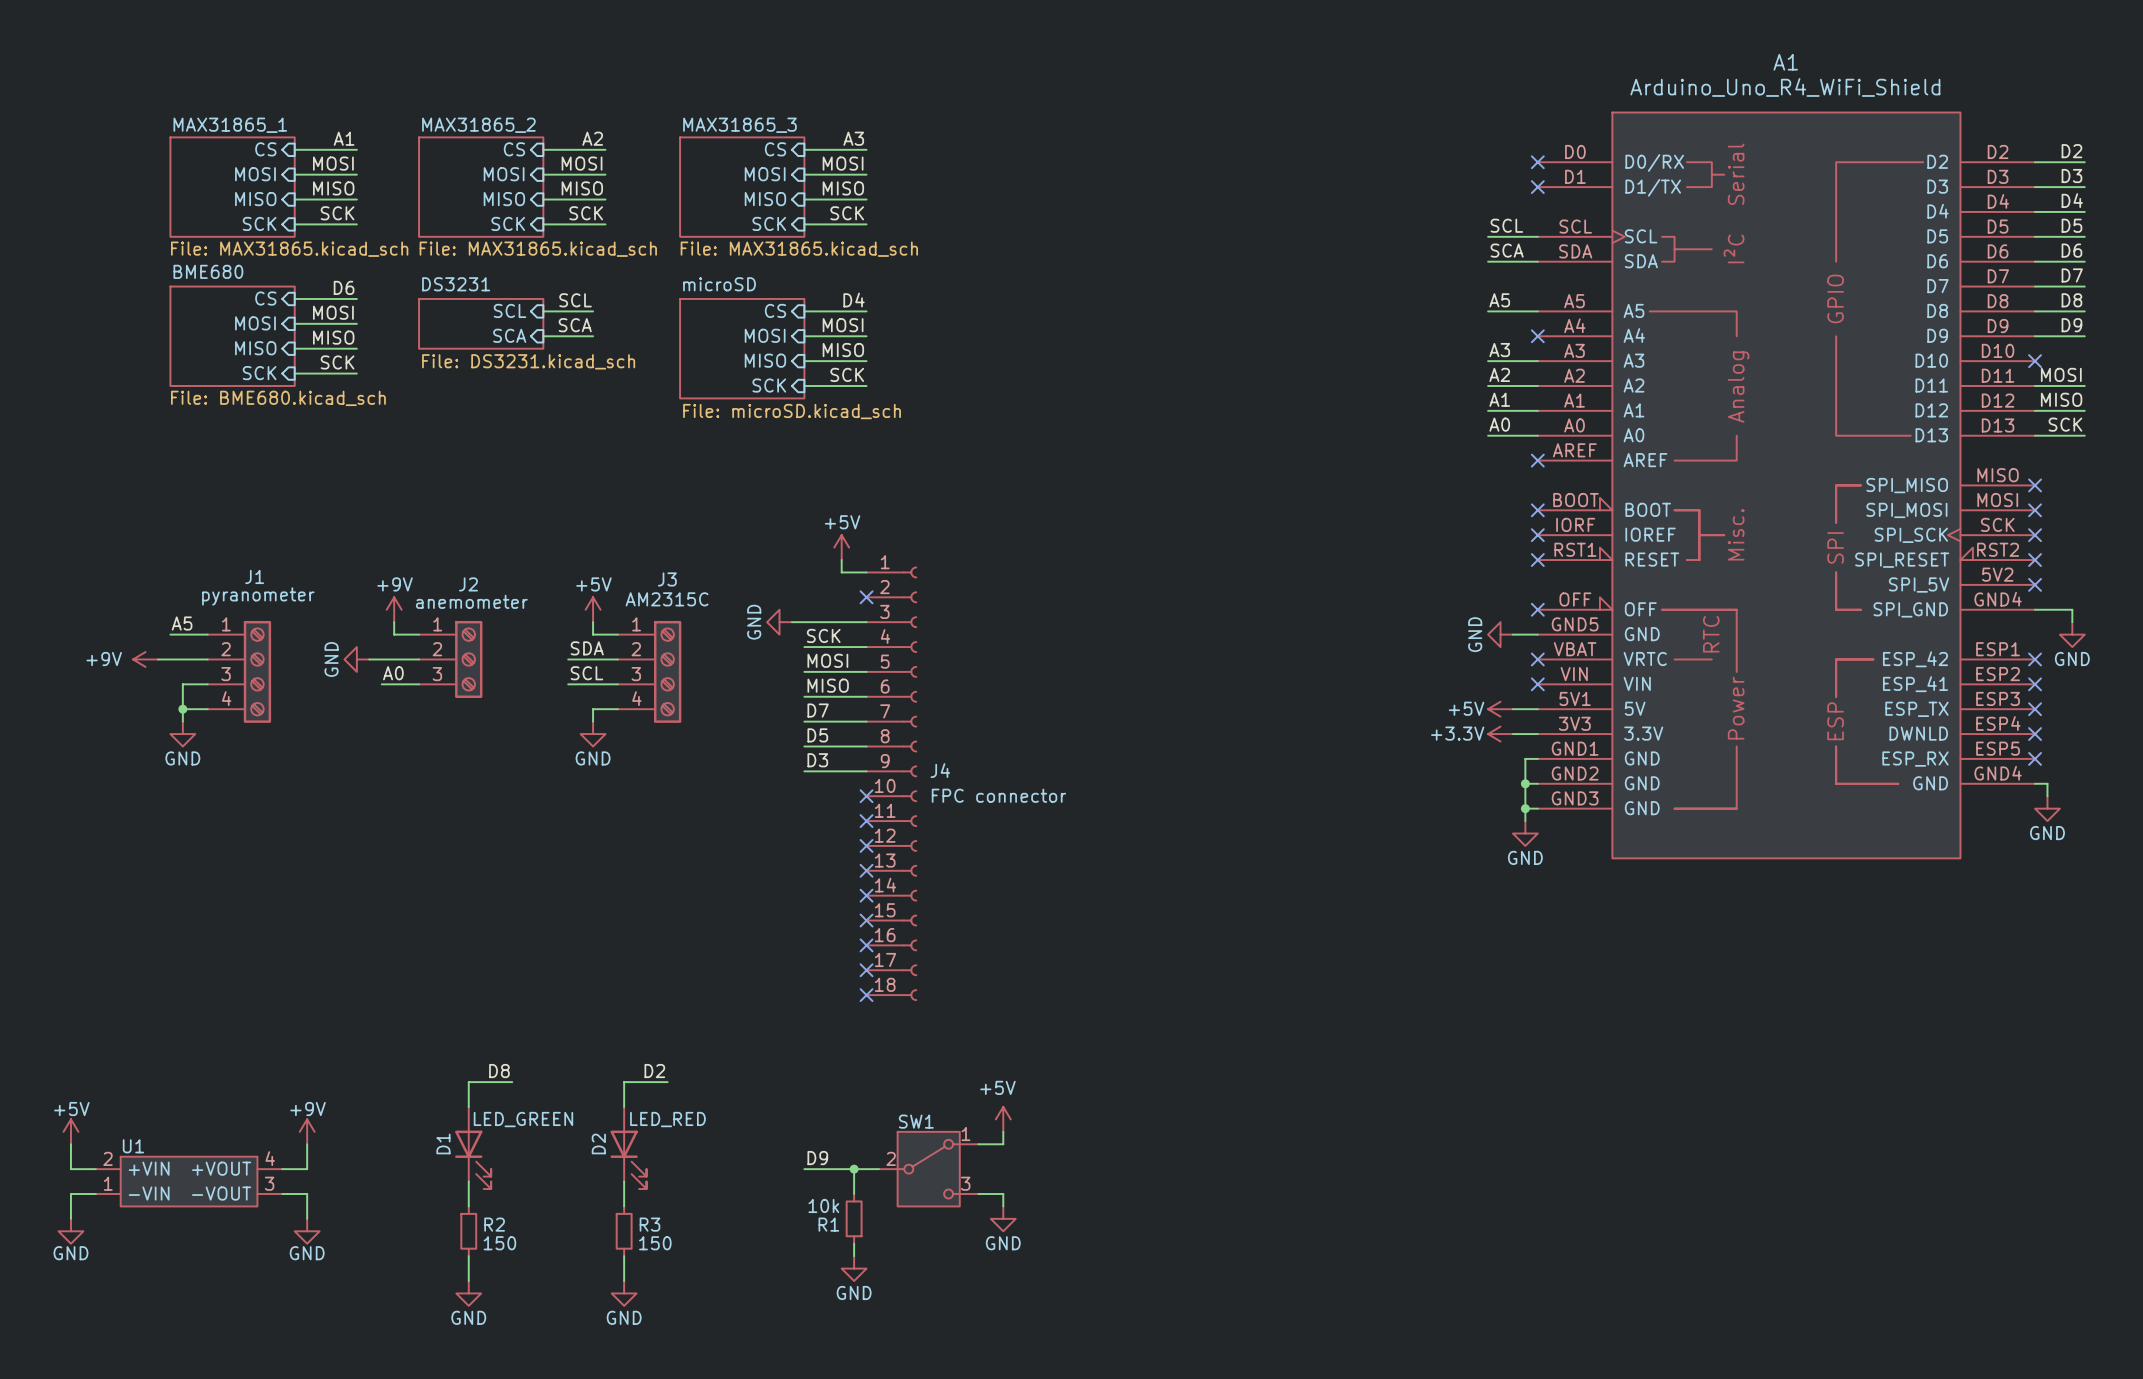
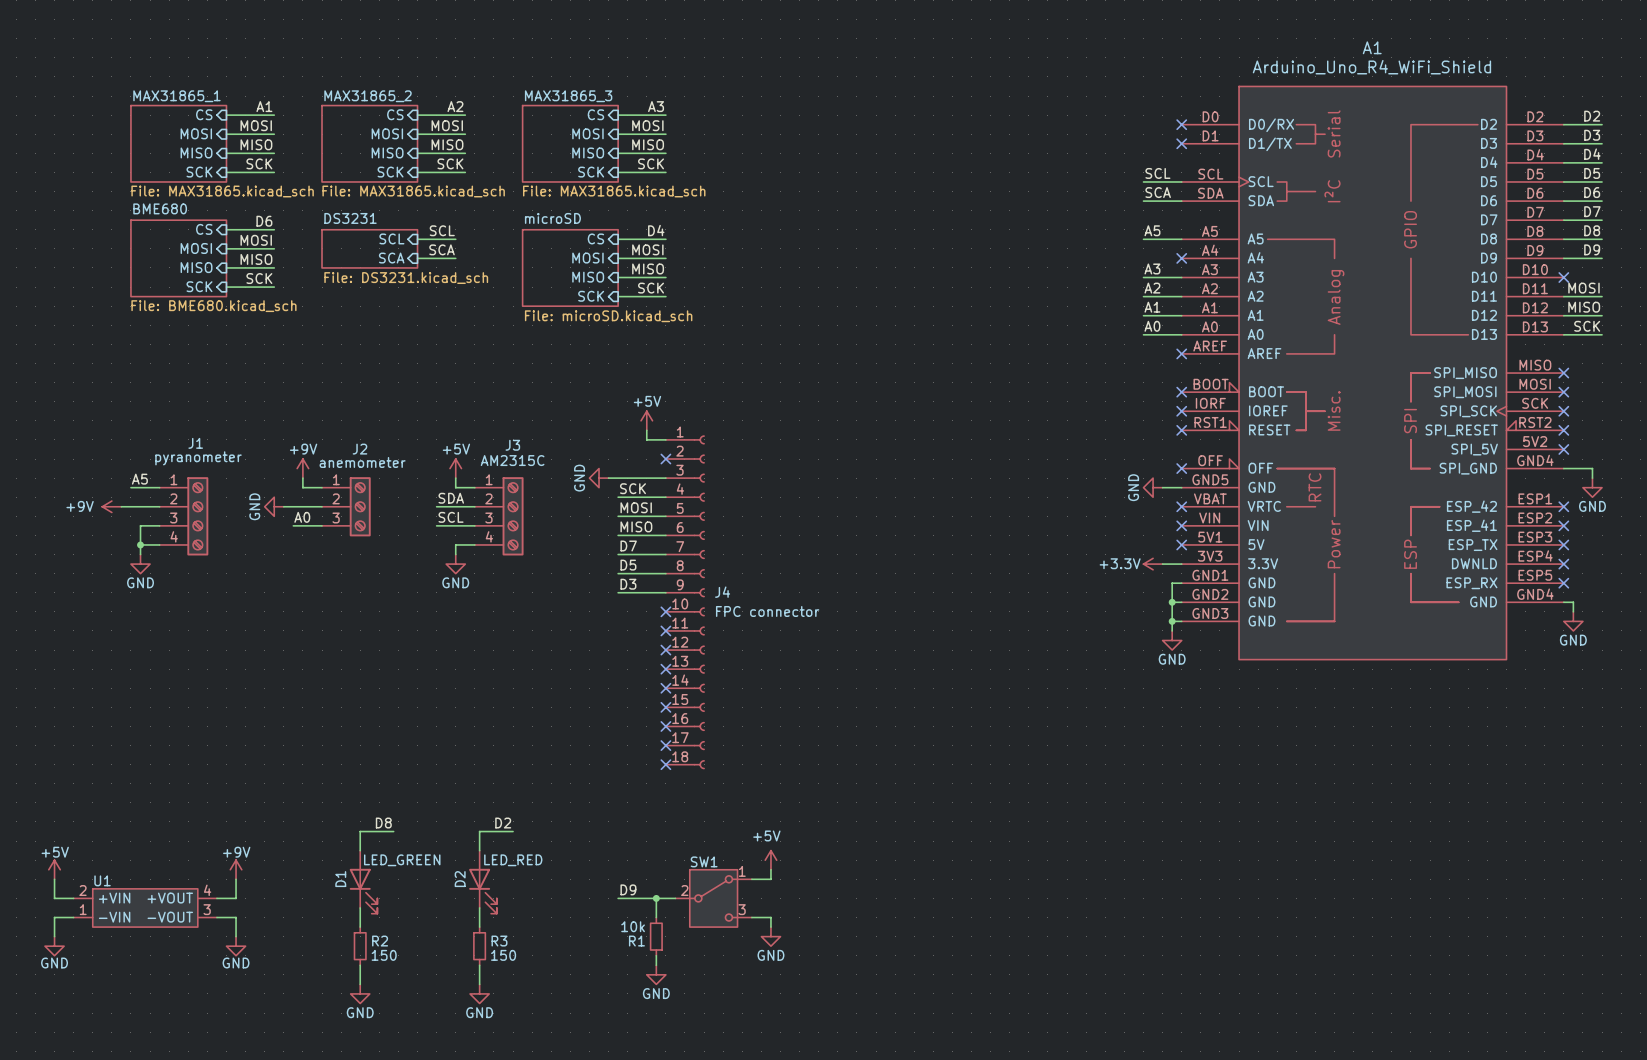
power symbol: +5V (1500, 709) -> none
wire: (1512, 709) (1537, 709) -> none
no-connect mark: none -> (1181, 544)

